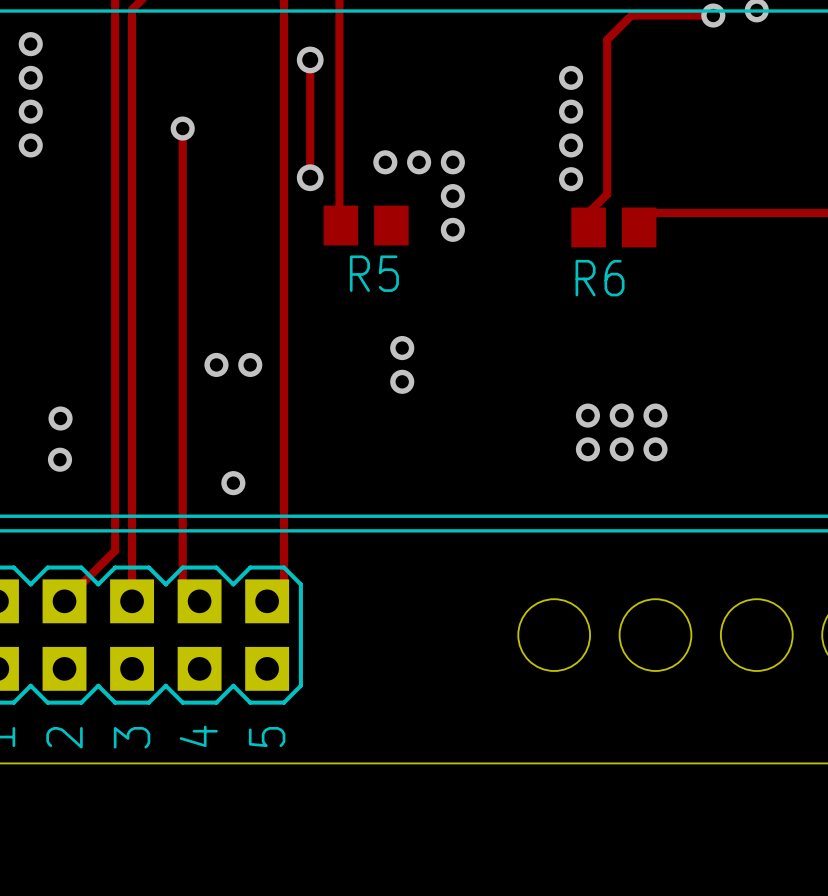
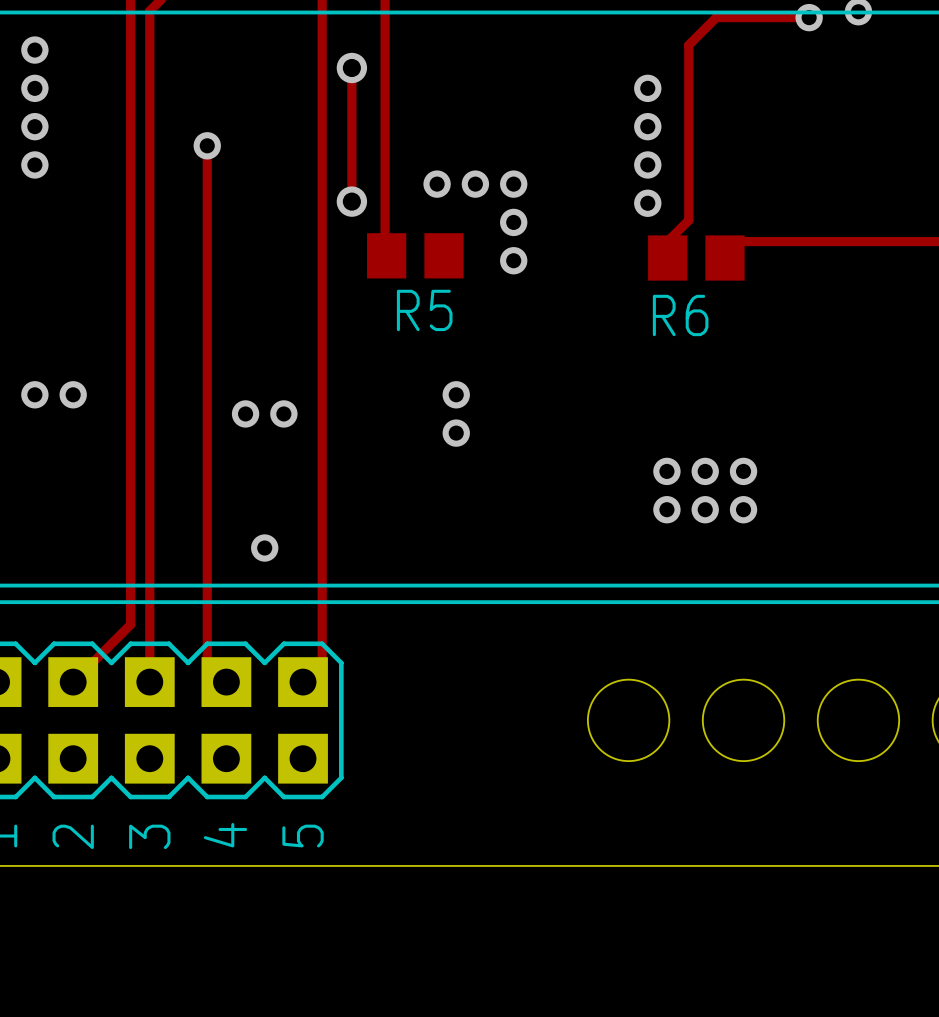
via: none -> (34, 394)
via: none -> (73, 394)
via: (60, 418) -> none
via: (60, 459) -> none

